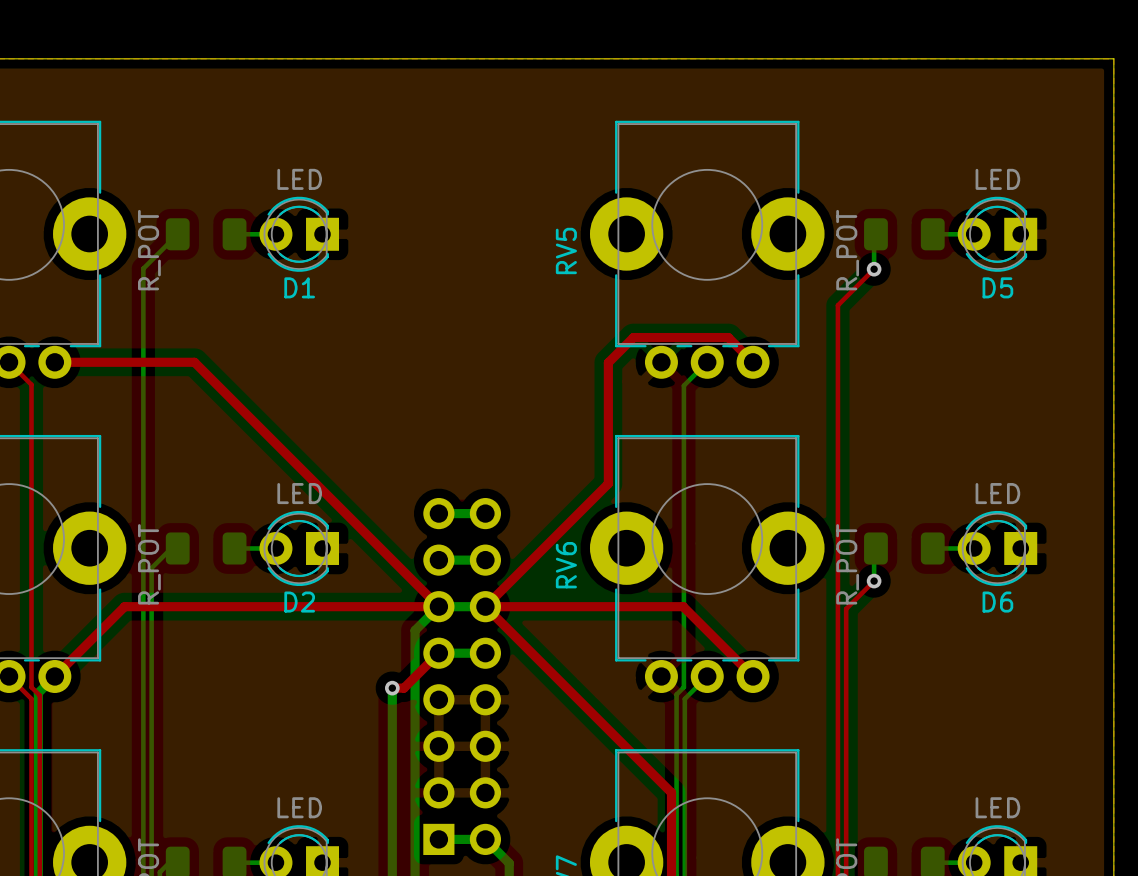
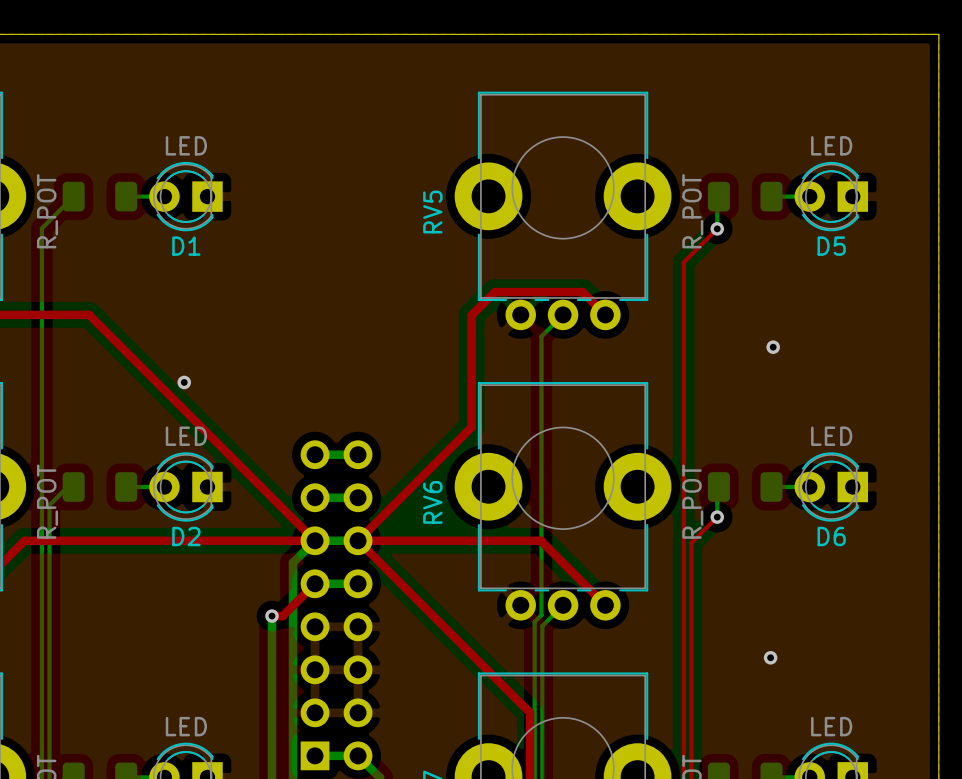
via: none -> (773, 347)
via: none -> (184, 382)
via: none -> (770, 657)

